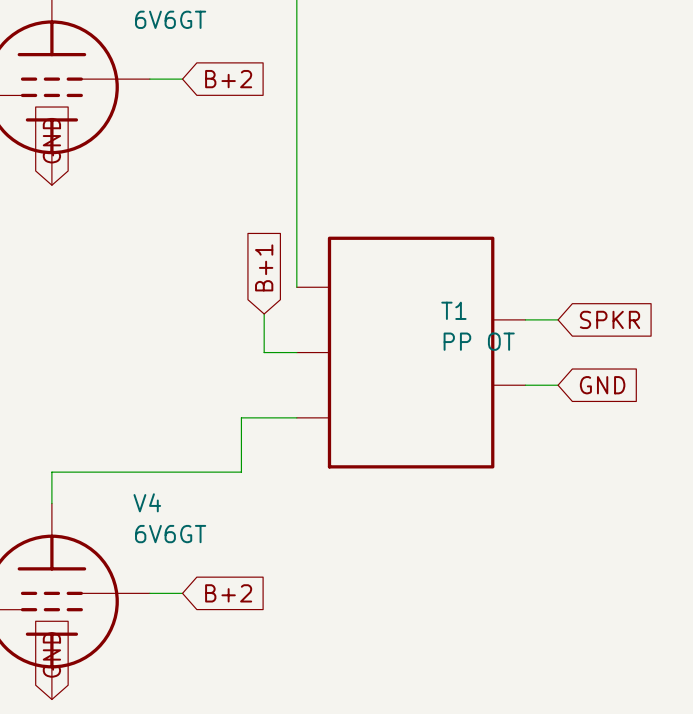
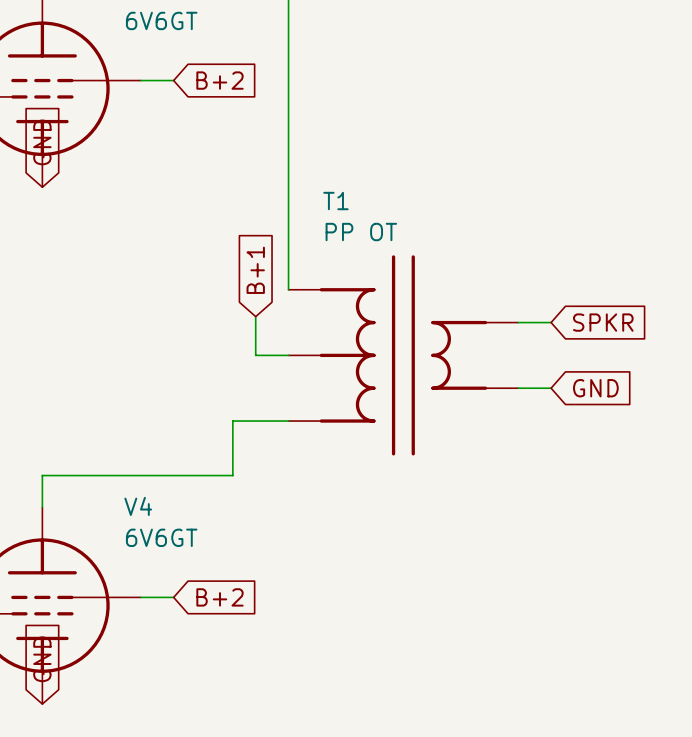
T1 symbol: [296, 236, 526, 469] -> [288, 255, 519, 456]
T1 name position: T1 (453, 310) -> T1 (335, 201)
T1 value position: PP OT (479, 341) -> PP OT (361, 232)

